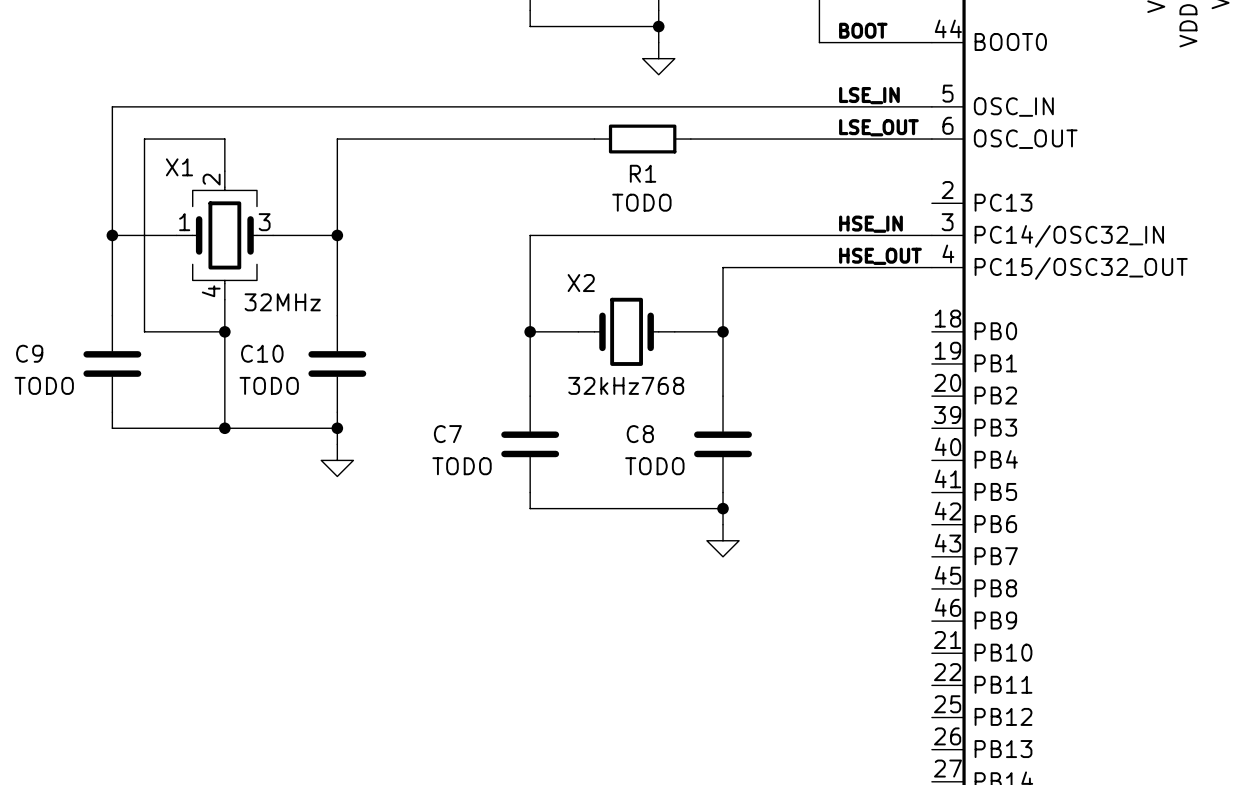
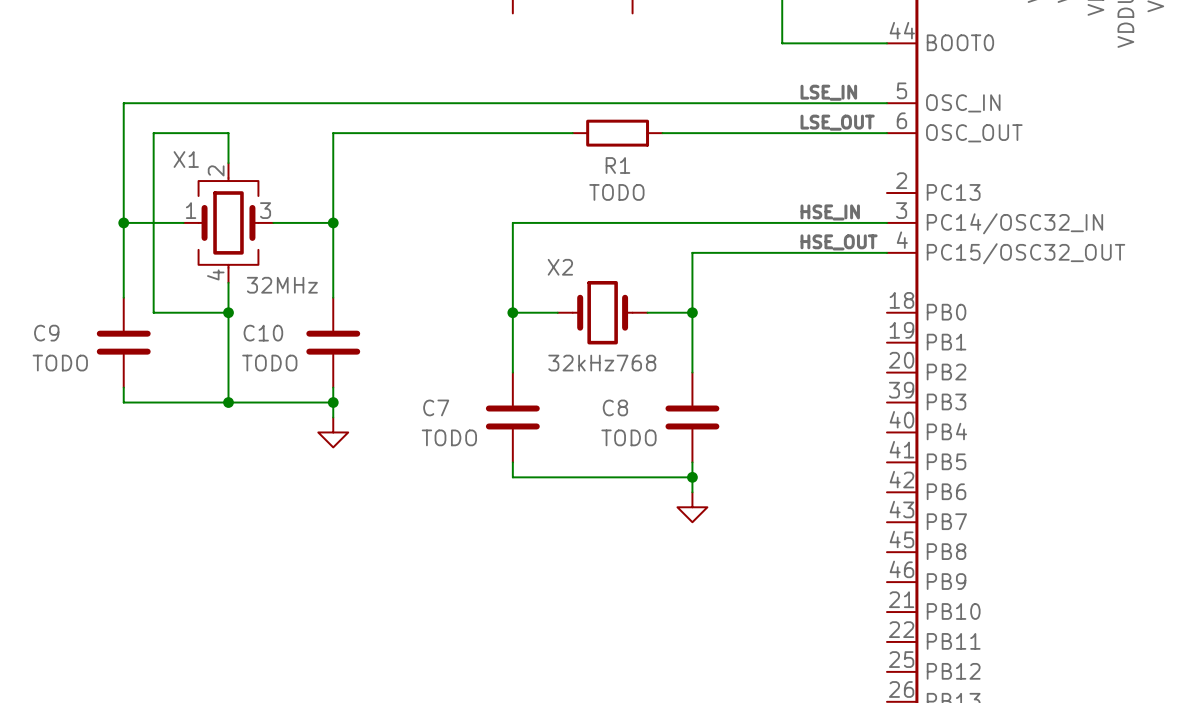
wire: (530, 10) (530, 26) (658, 26) -> none
wire: (658, 10) (658, 42) -> none
junction: (658, 26) -> none
label: BOOT (863, 30) -> none
power symbol: (658, 58) -> none

